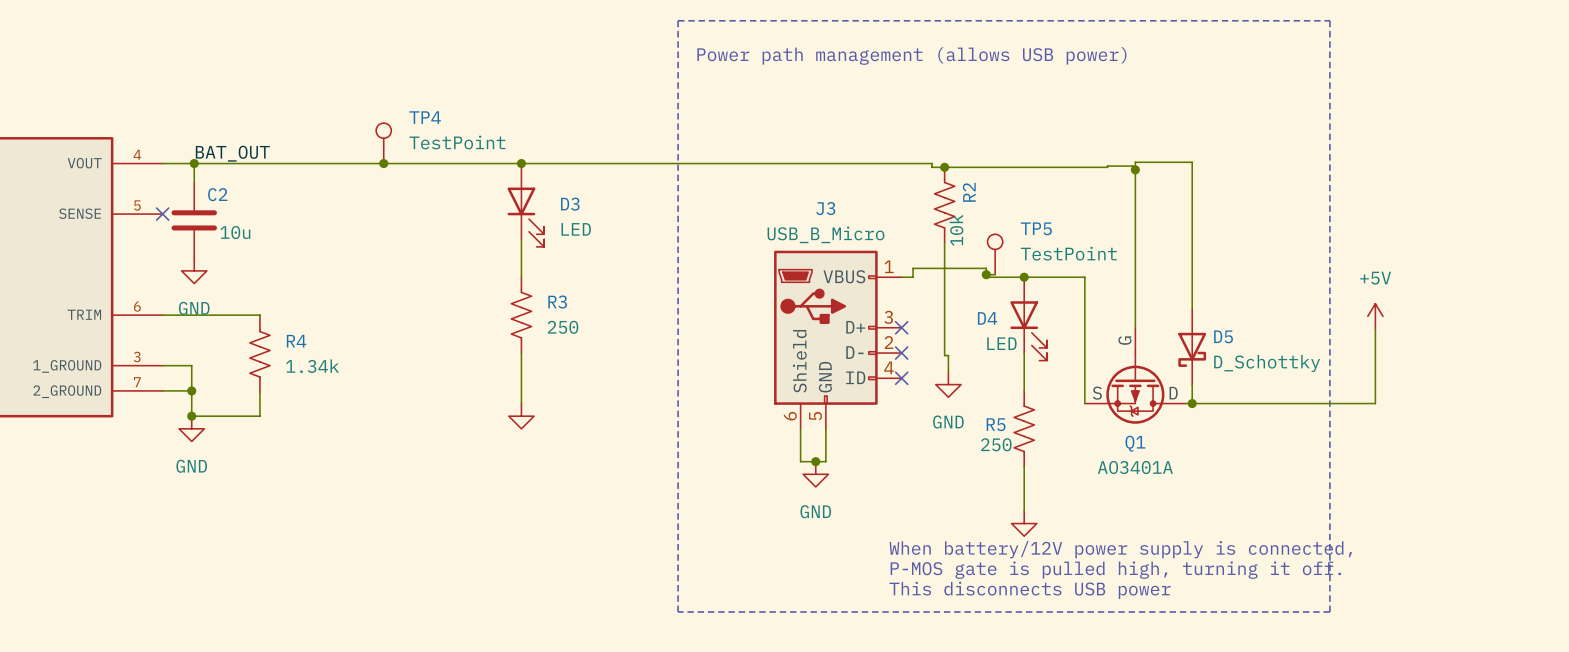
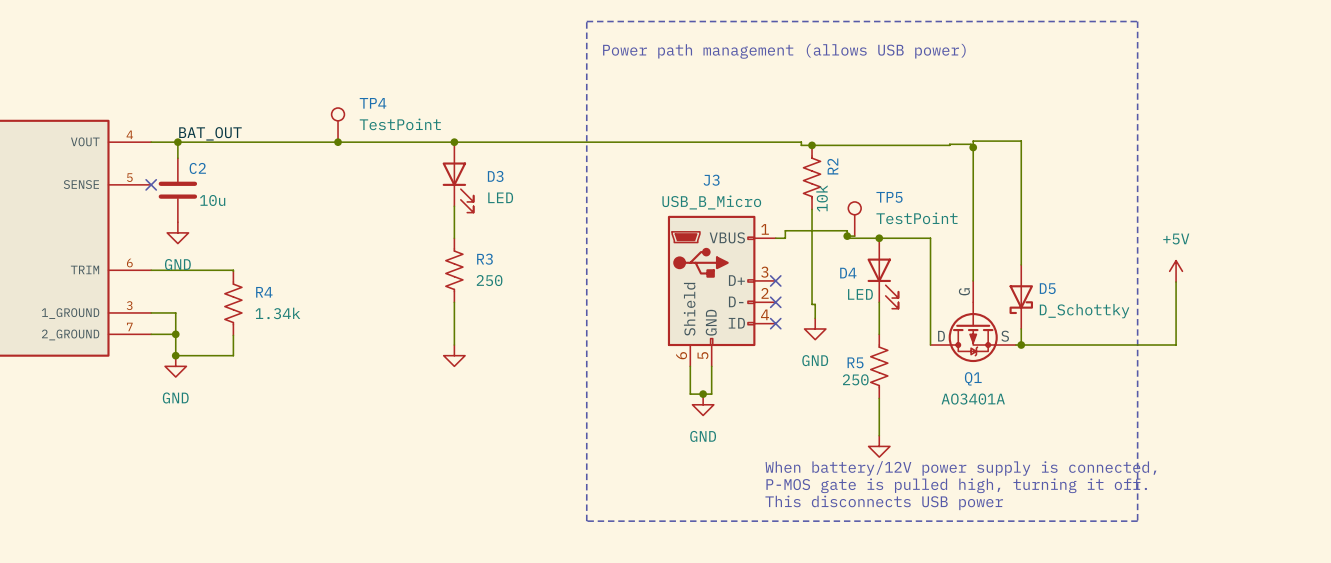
Q1 flip: as is (1135, 388) -> left-right (973, 332)

